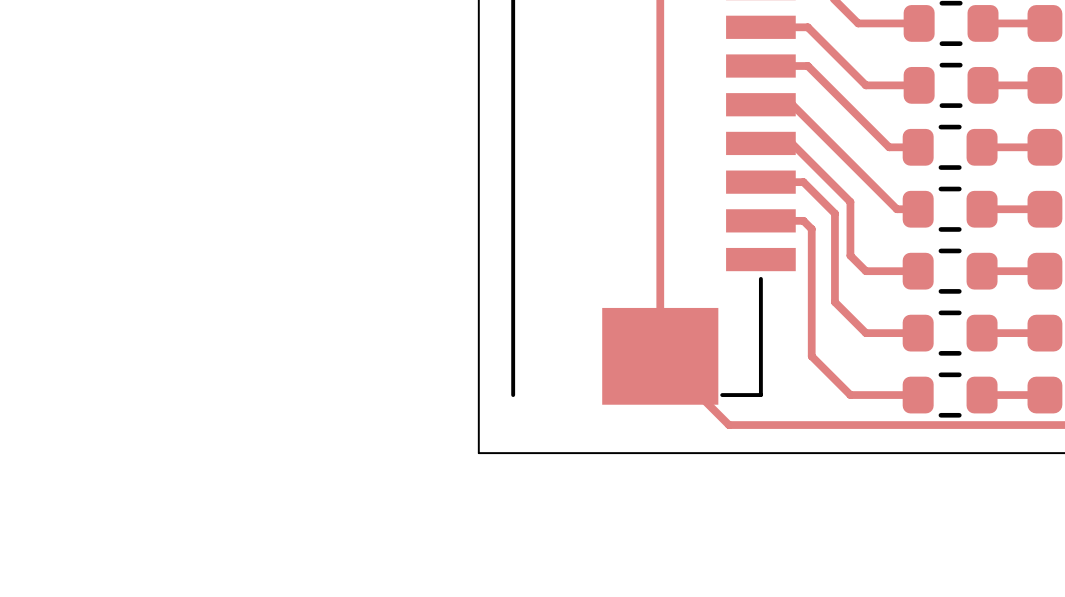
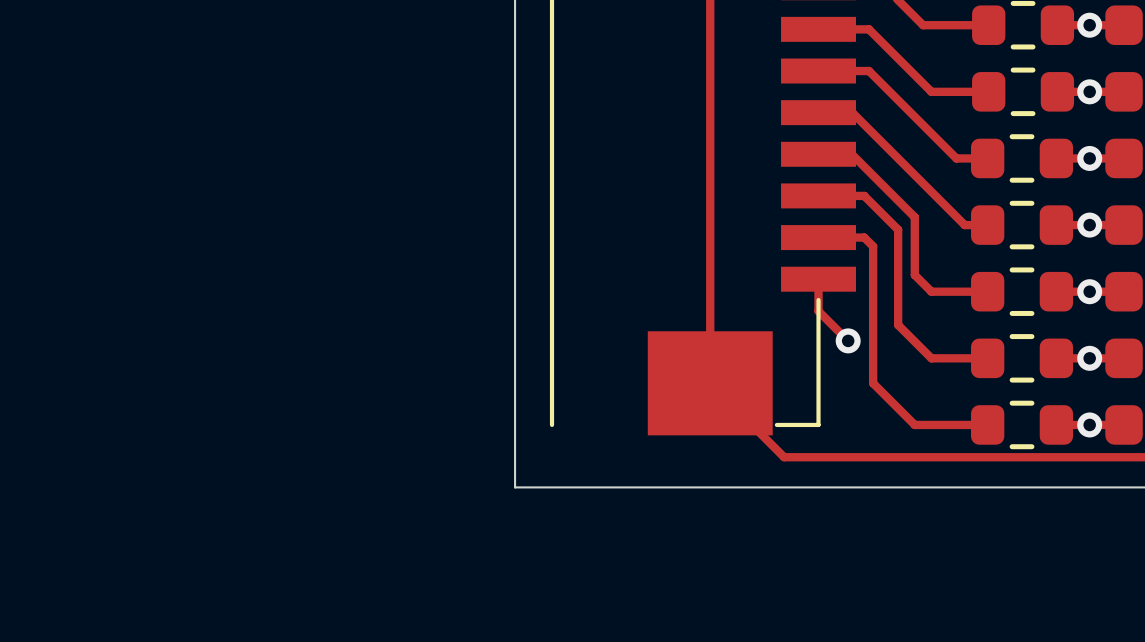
via: none -> (1089, 25)
via: none -> (1089, 91)
via: none -> (1089, 158)
via: none -> (1089, 225)
track: none -> (818, 279) (818, 311) (848, 340)
via: none -> (1089, 291)
via: none -> (848, 340)
via: none -> (1089, 358)
via: none -> (1089, 424)

